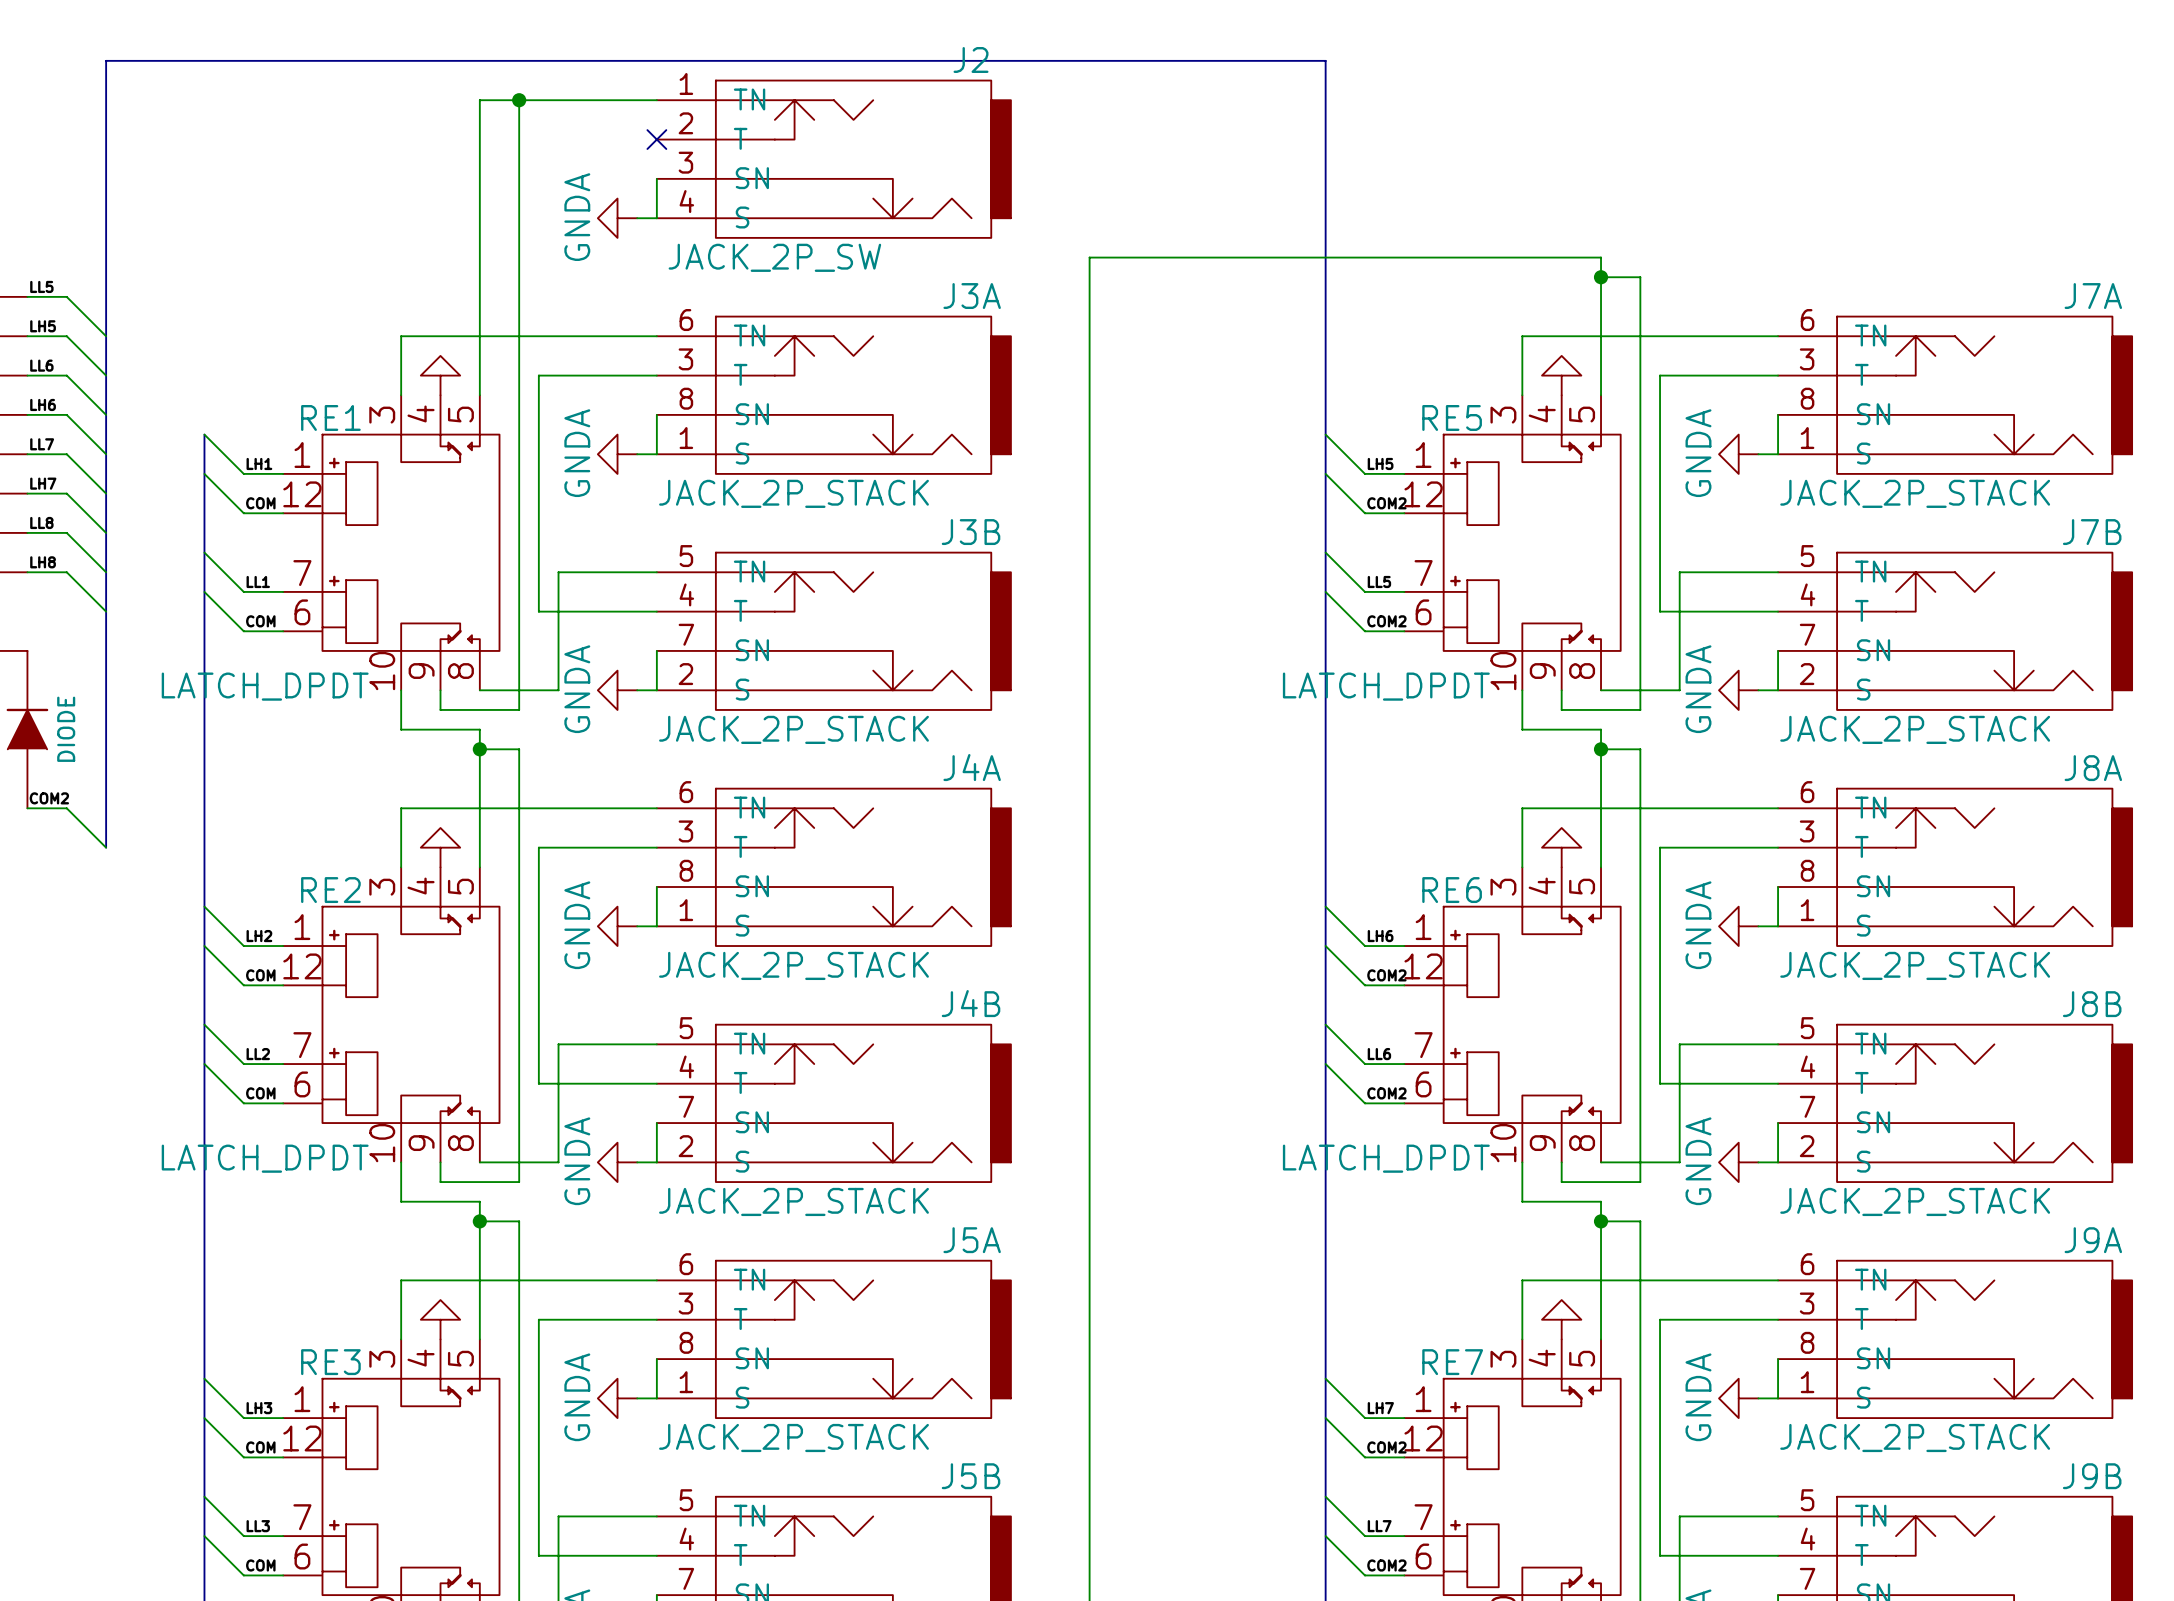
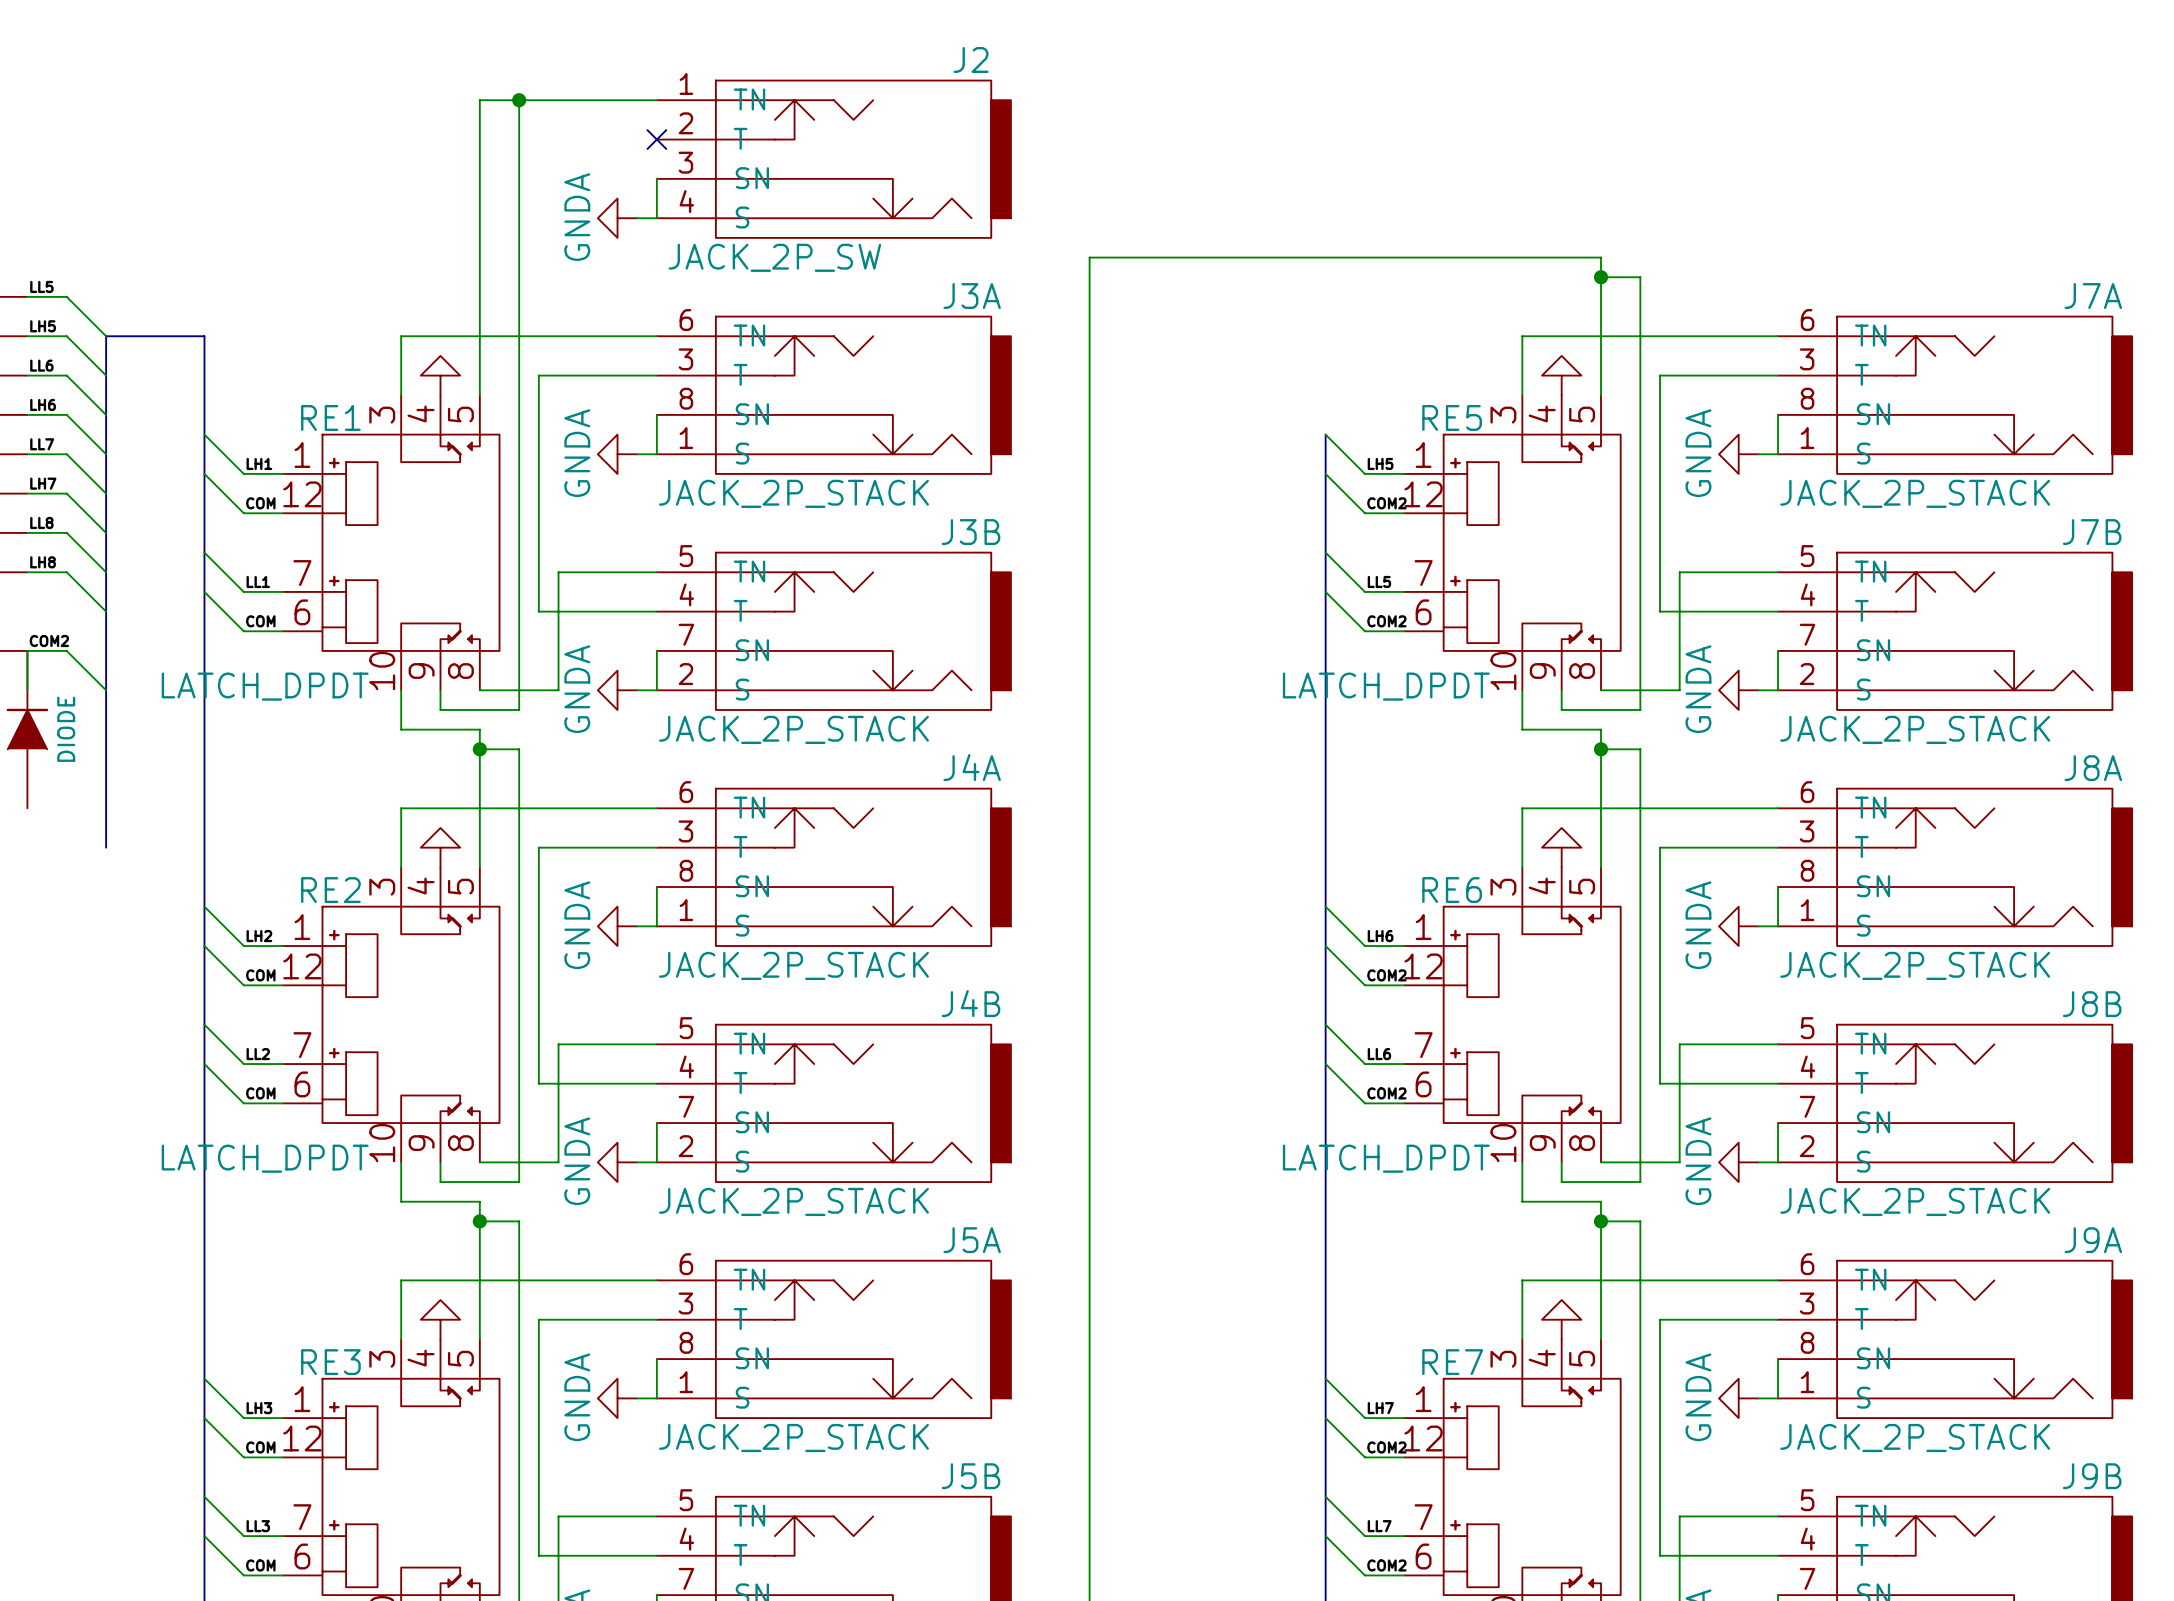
bus: (106, 336) (106, 60) (1325, 60) (1325, 434) -> (106, 336) (204, 336) (204, 434)
wire: none -> (27, 690) (27, 650) (66, 650) (106, 690)
label position: COM2 (49, 798) -> COM2 (49, 641)
wire: (27, 808) (66, 808) (106, 847) -> none

